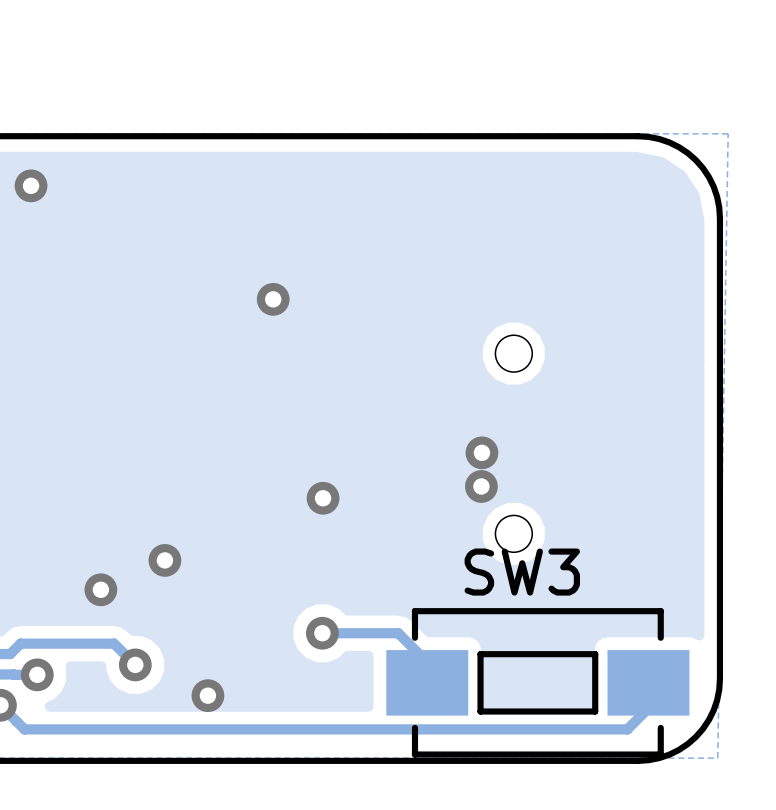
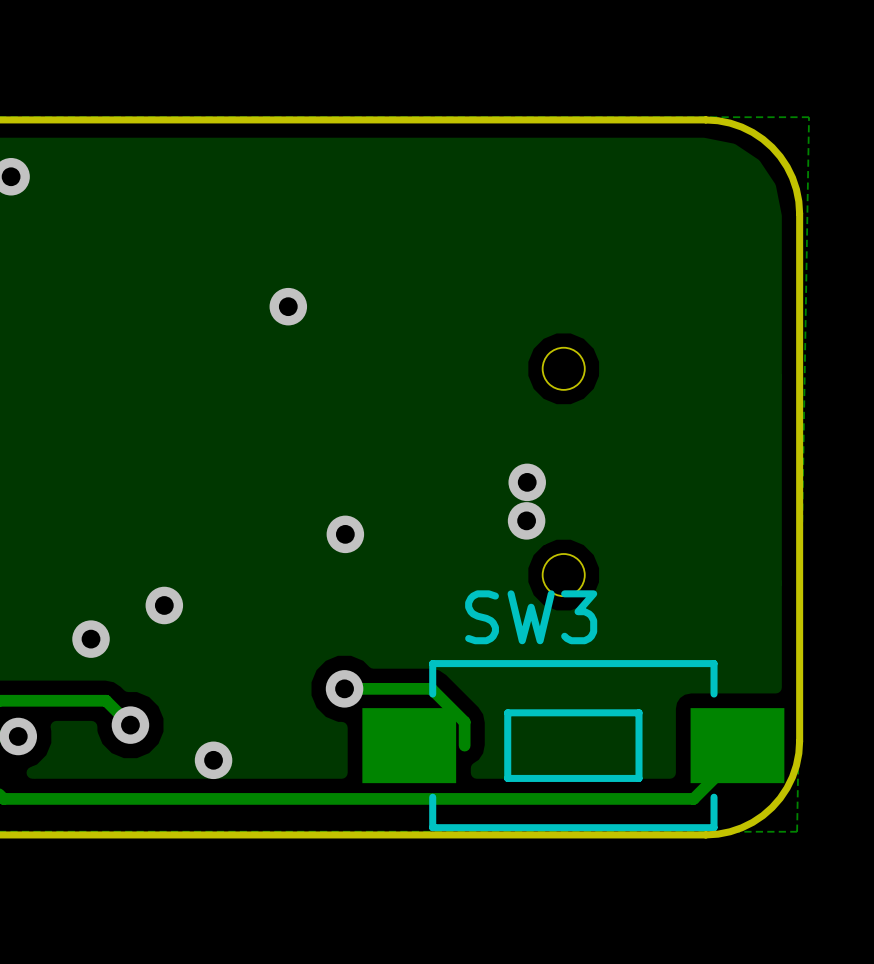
SW3 footprint: [386, 608, 690, 758] -> [362, 660, 785, 832]

